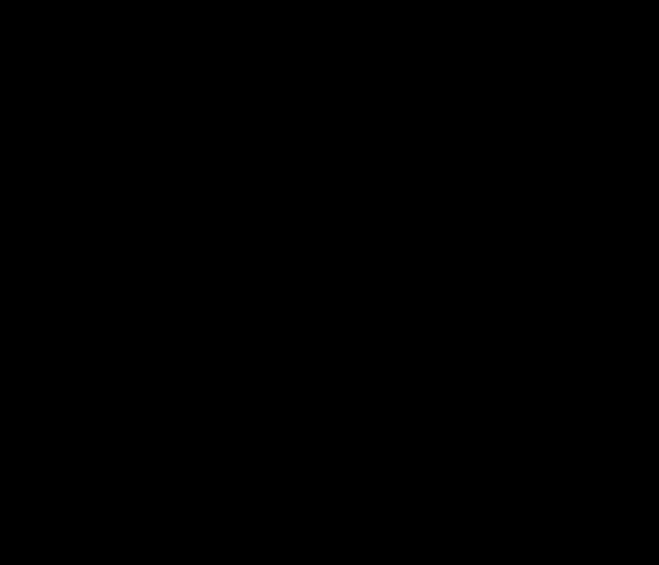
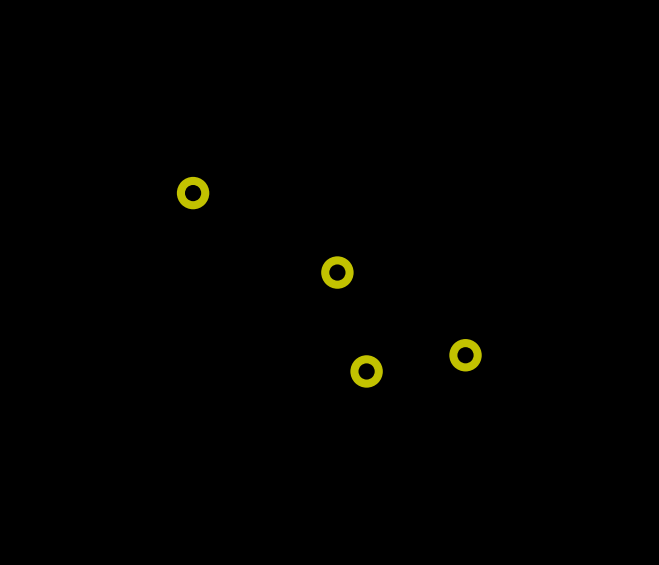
part: none -> (193, 193)
part: none -> (337, 272)
part: none -> (465, 355)
part: none -> (366, 371)

